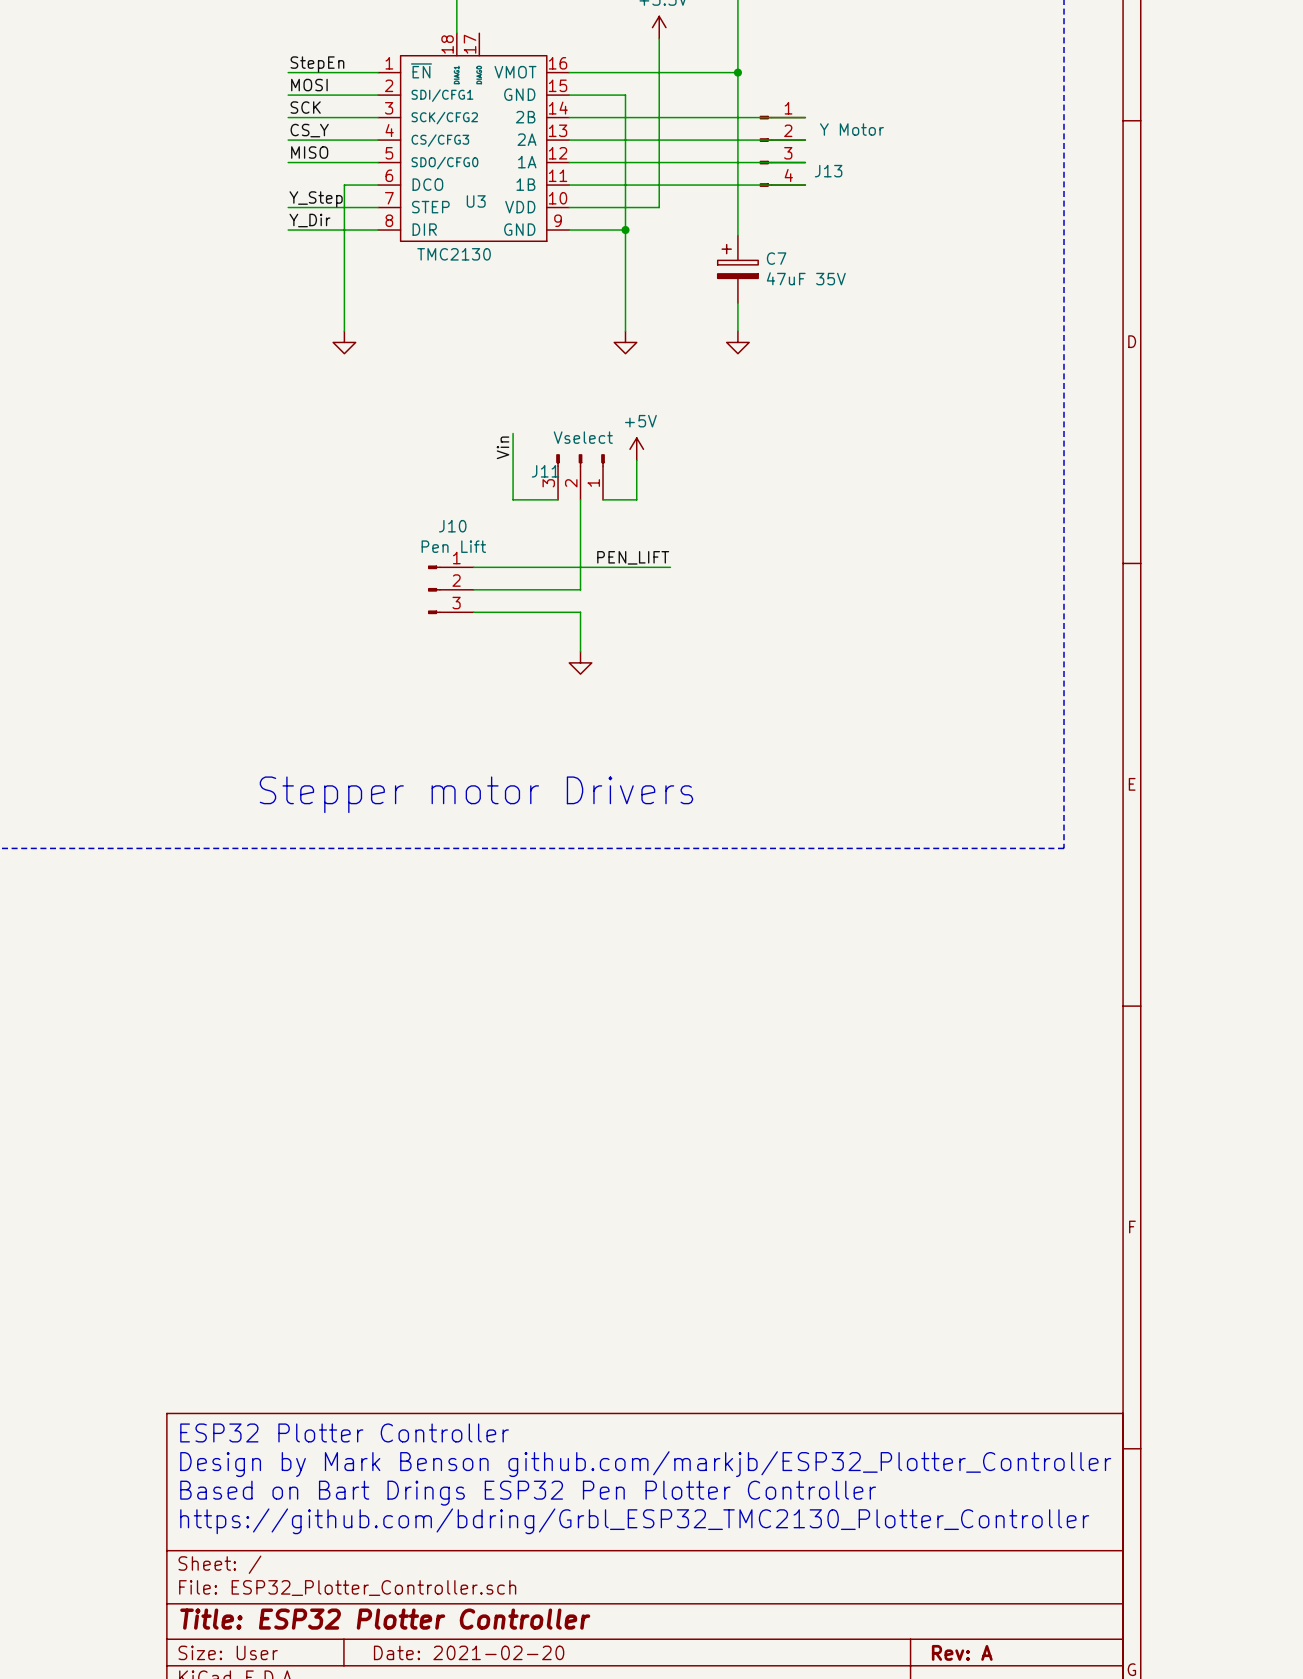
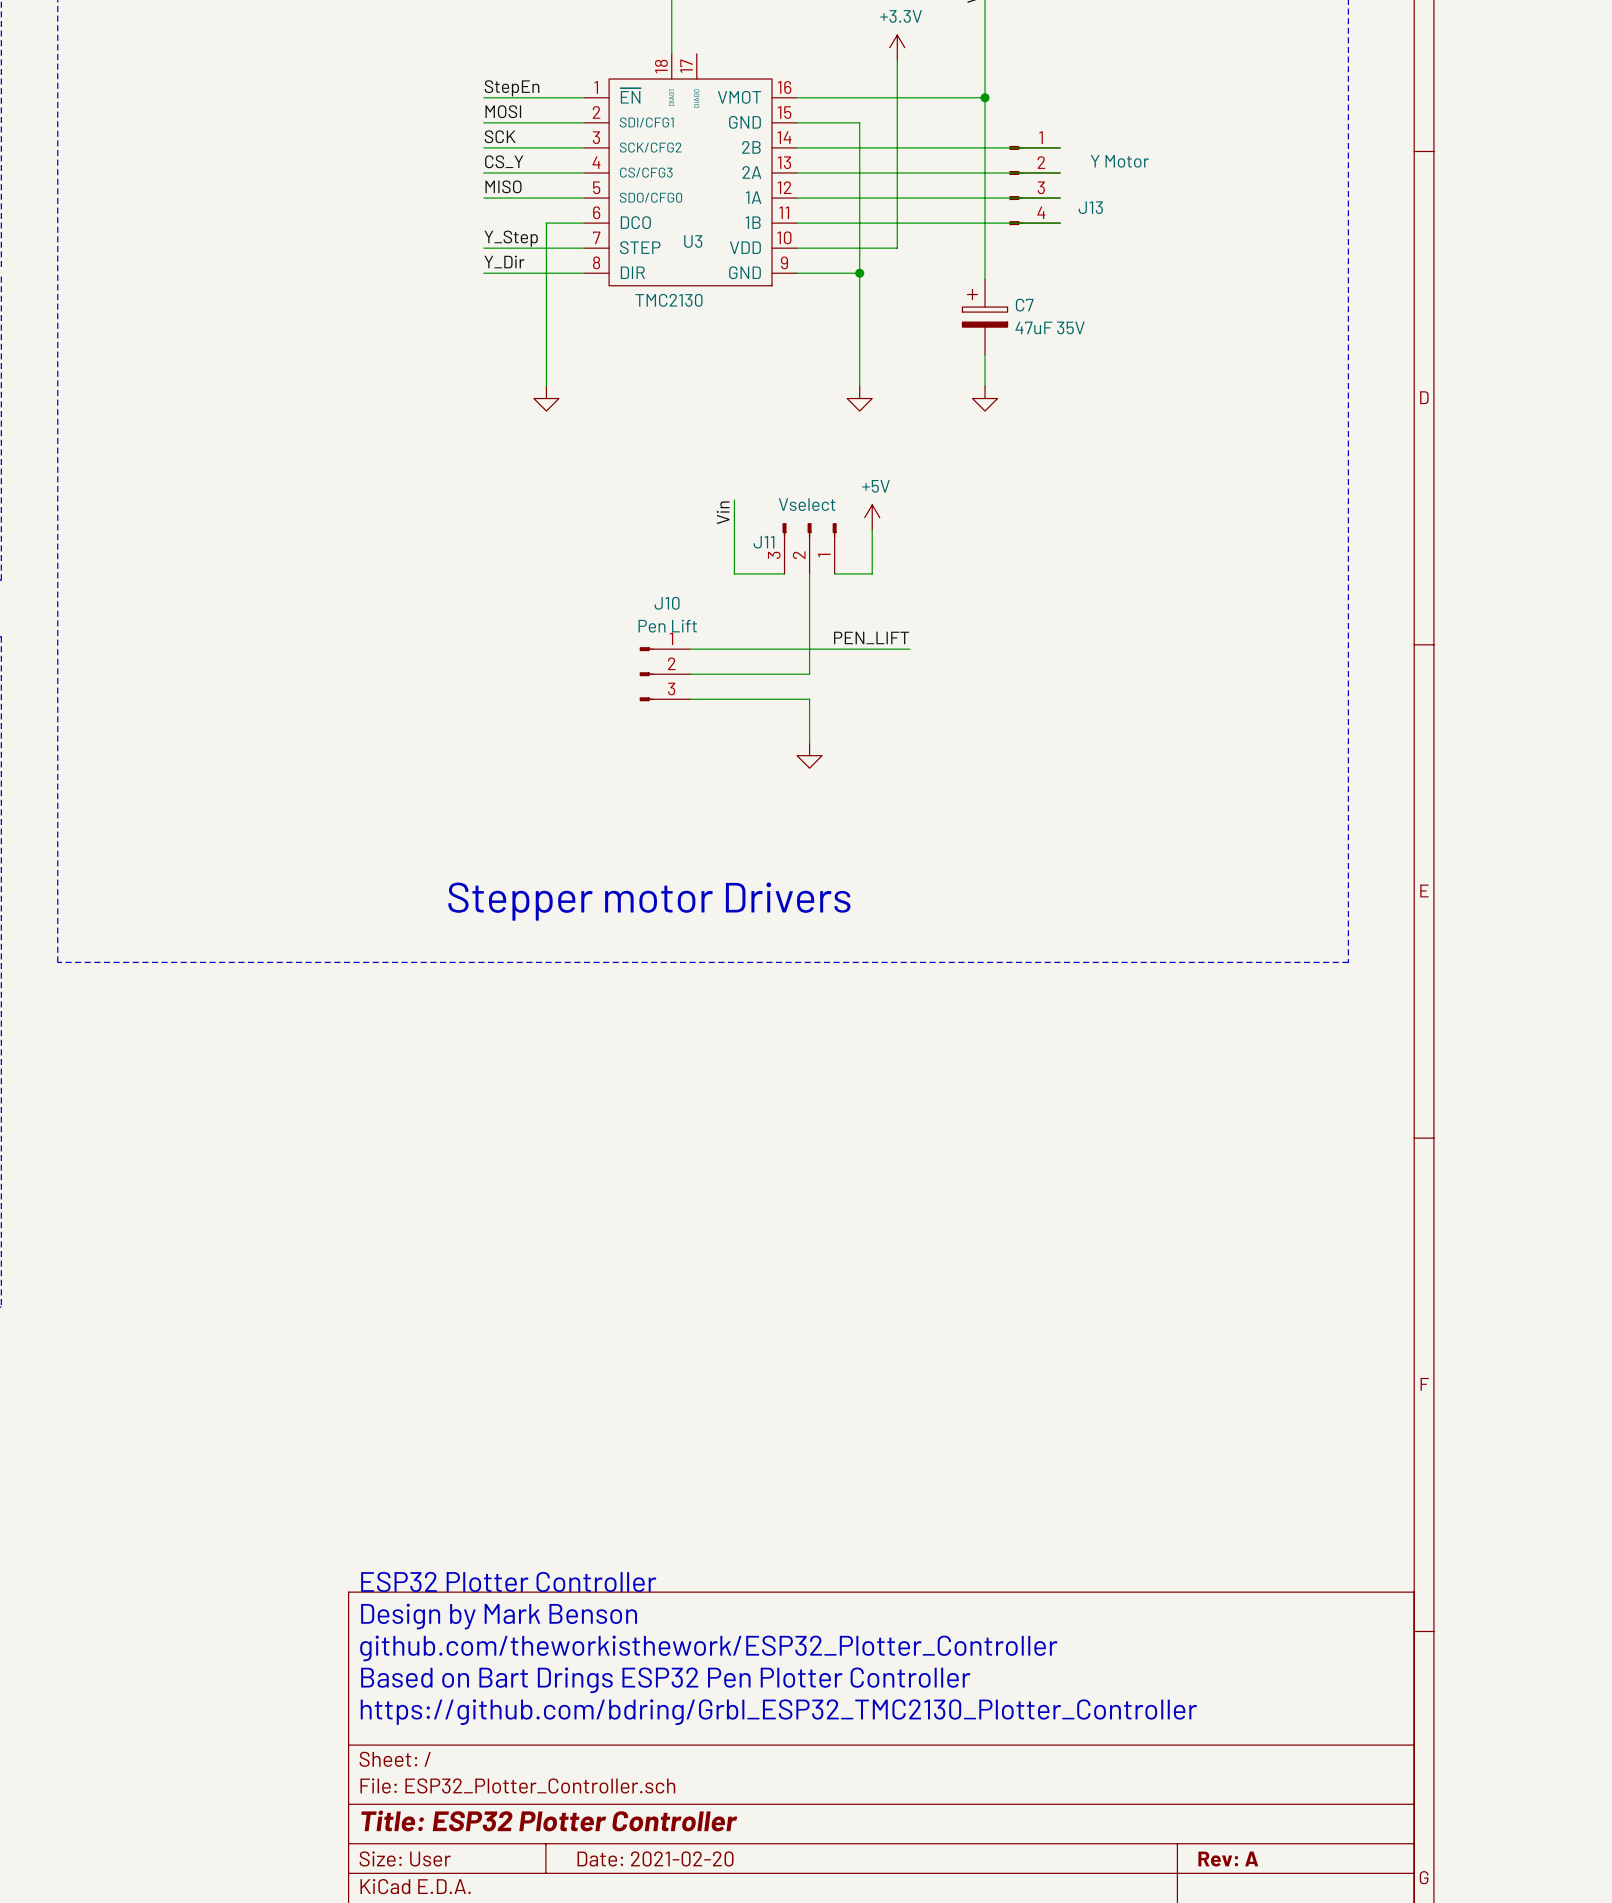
text: none -> ESP32 Plotter Controller (508, 1582)
text: ESP32 Plotter Controller (344, 1432) -> Design by Mark Benson (499, 1616)
text: Design by Mark Benson github.com/markjb/ESP32_Plotter_Controller (645, 1464) -> github.com/theworkisthework/ESP32_Plotter_Controller (708, 1648)

